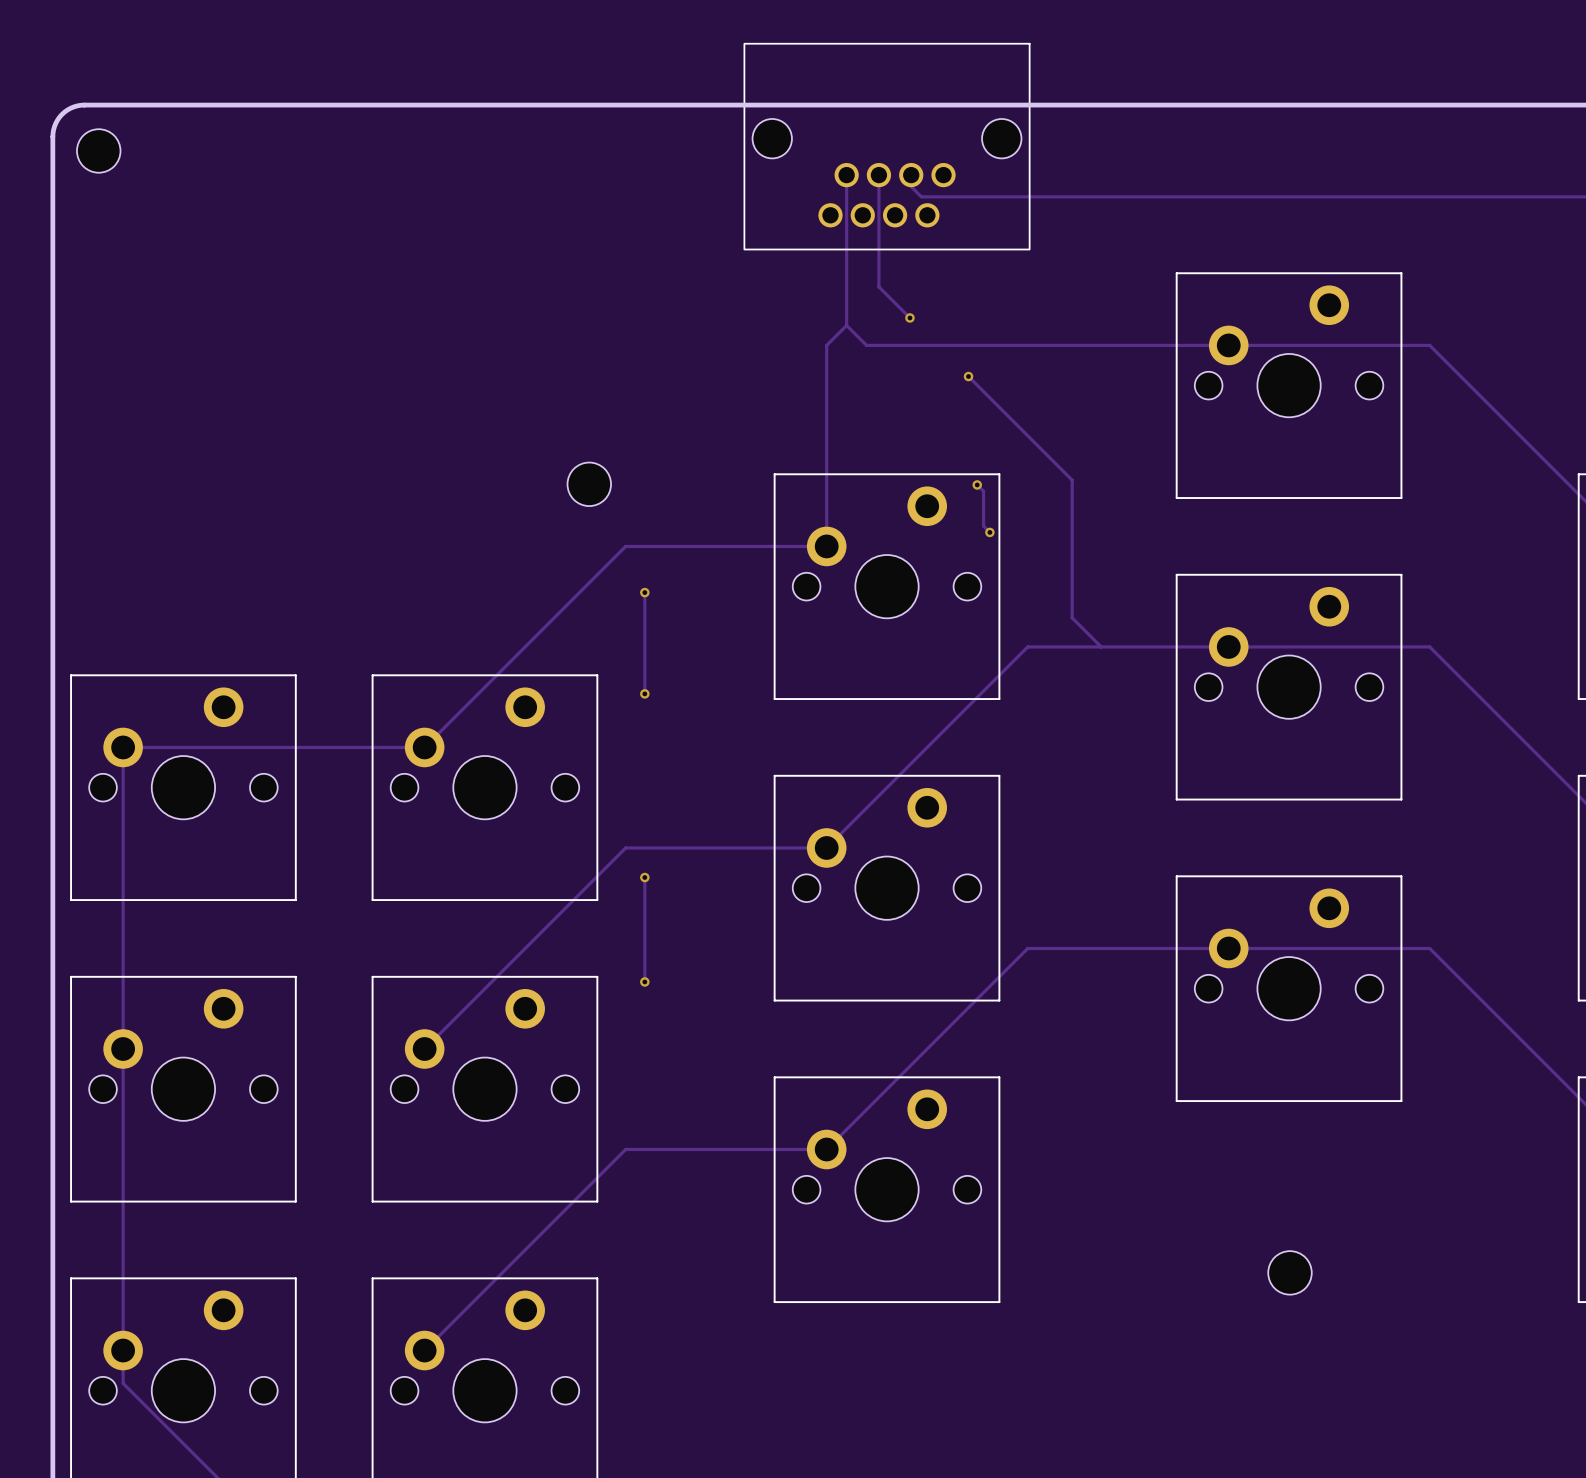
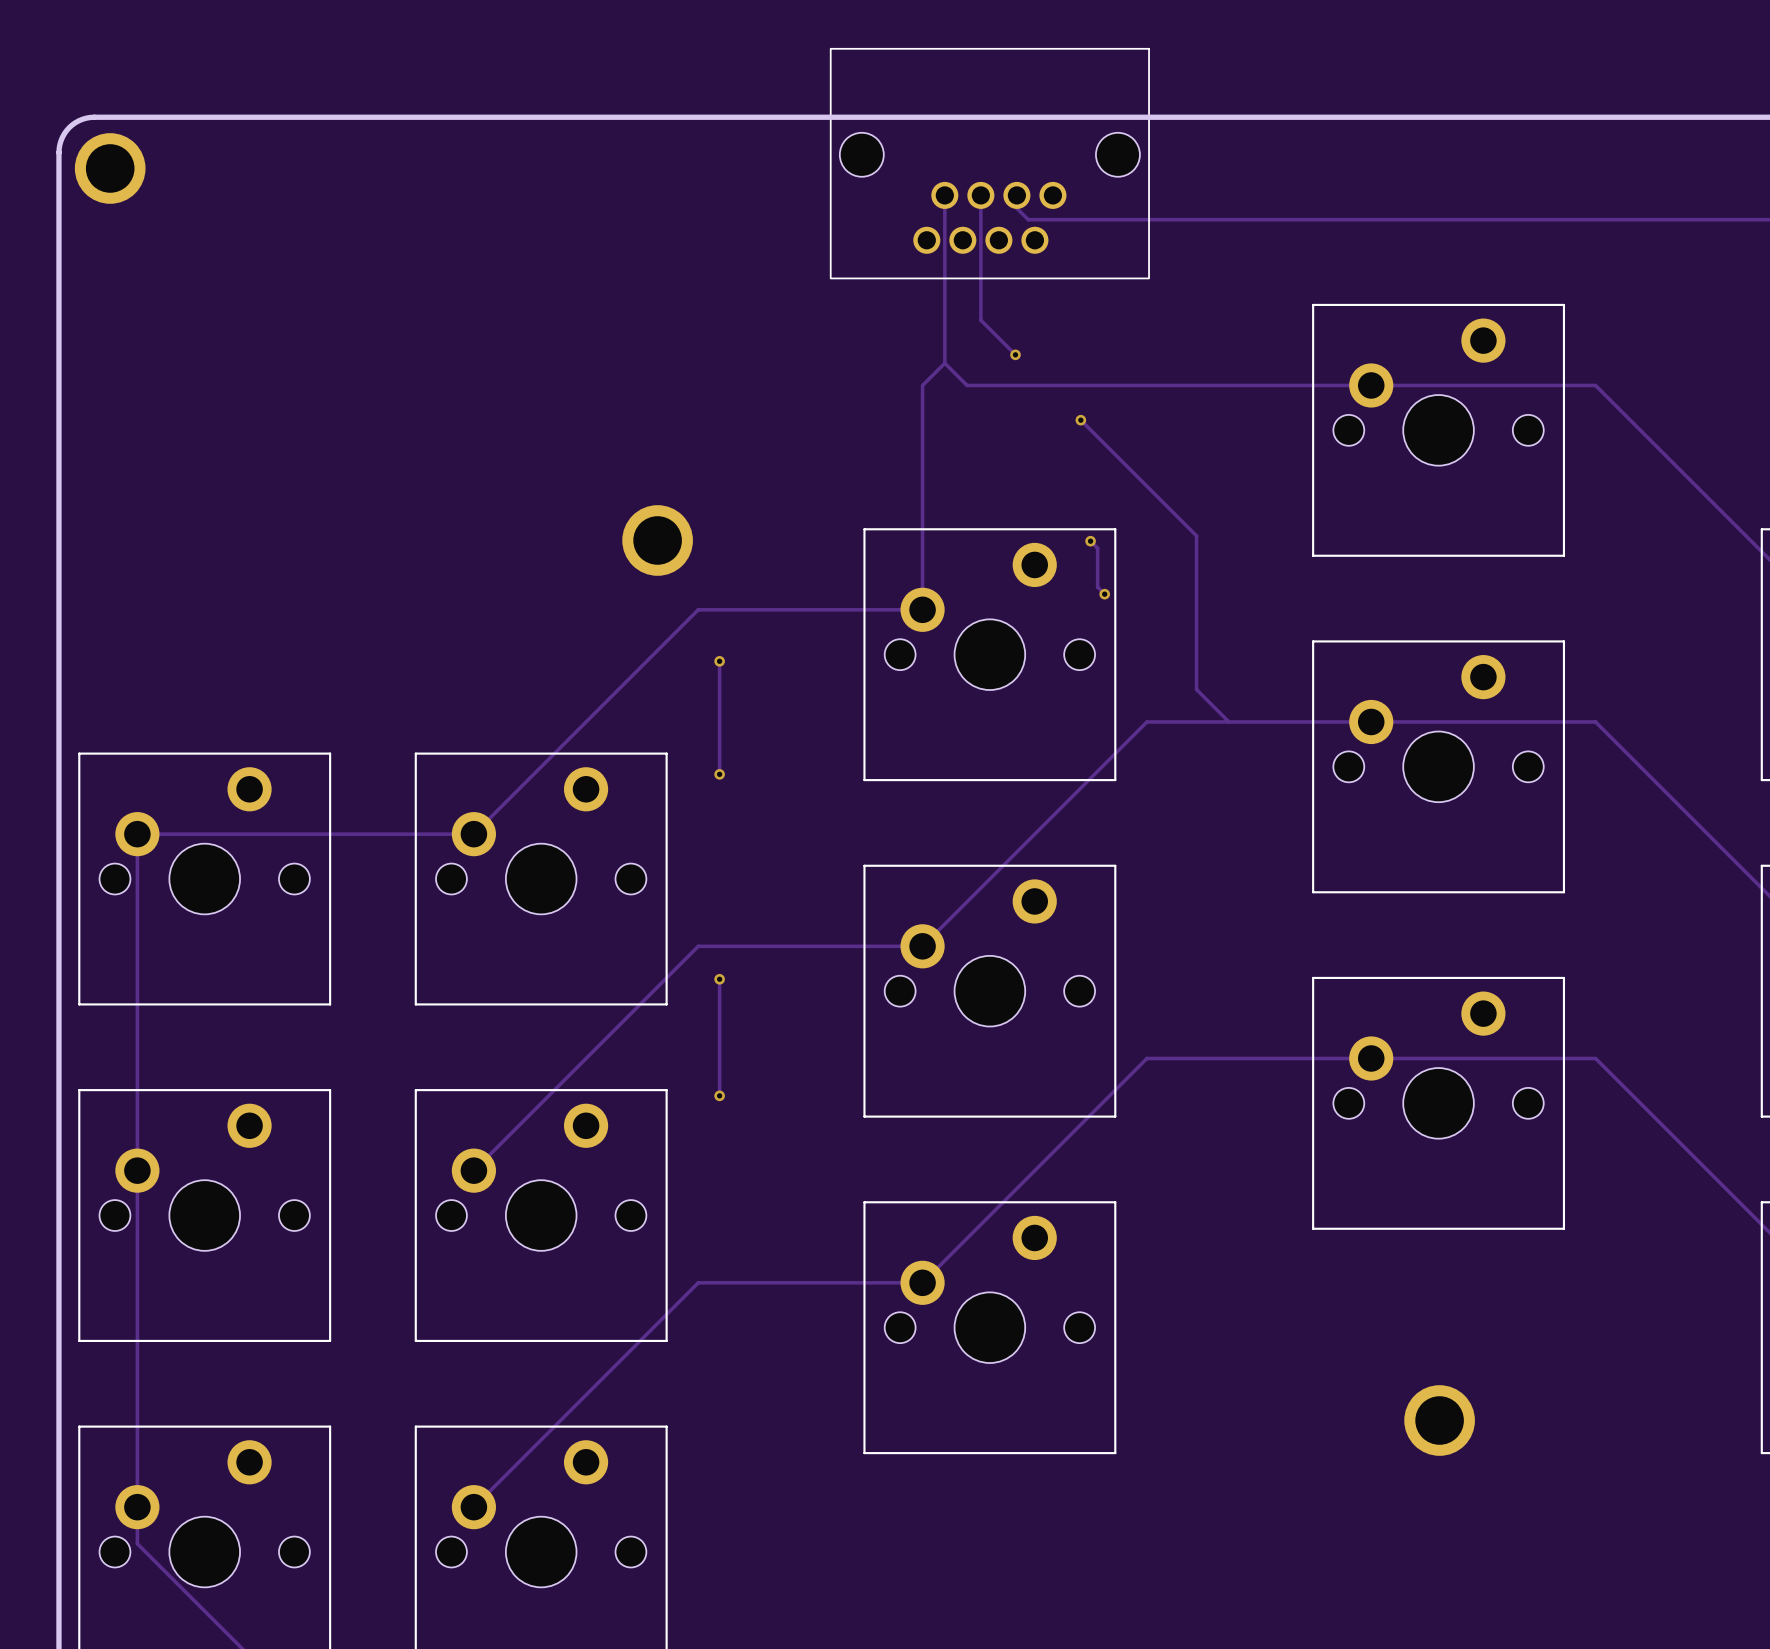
part footprint: [76, 129, 121, 173] -> [74, 133, 146, 204]
part footprint: [567, 462, 612, 507] -> [622, 505, 693, 576]
part footprint: [1268, 1251, 1312, 1295] -> [1404, 1385, 1475, 1456]

